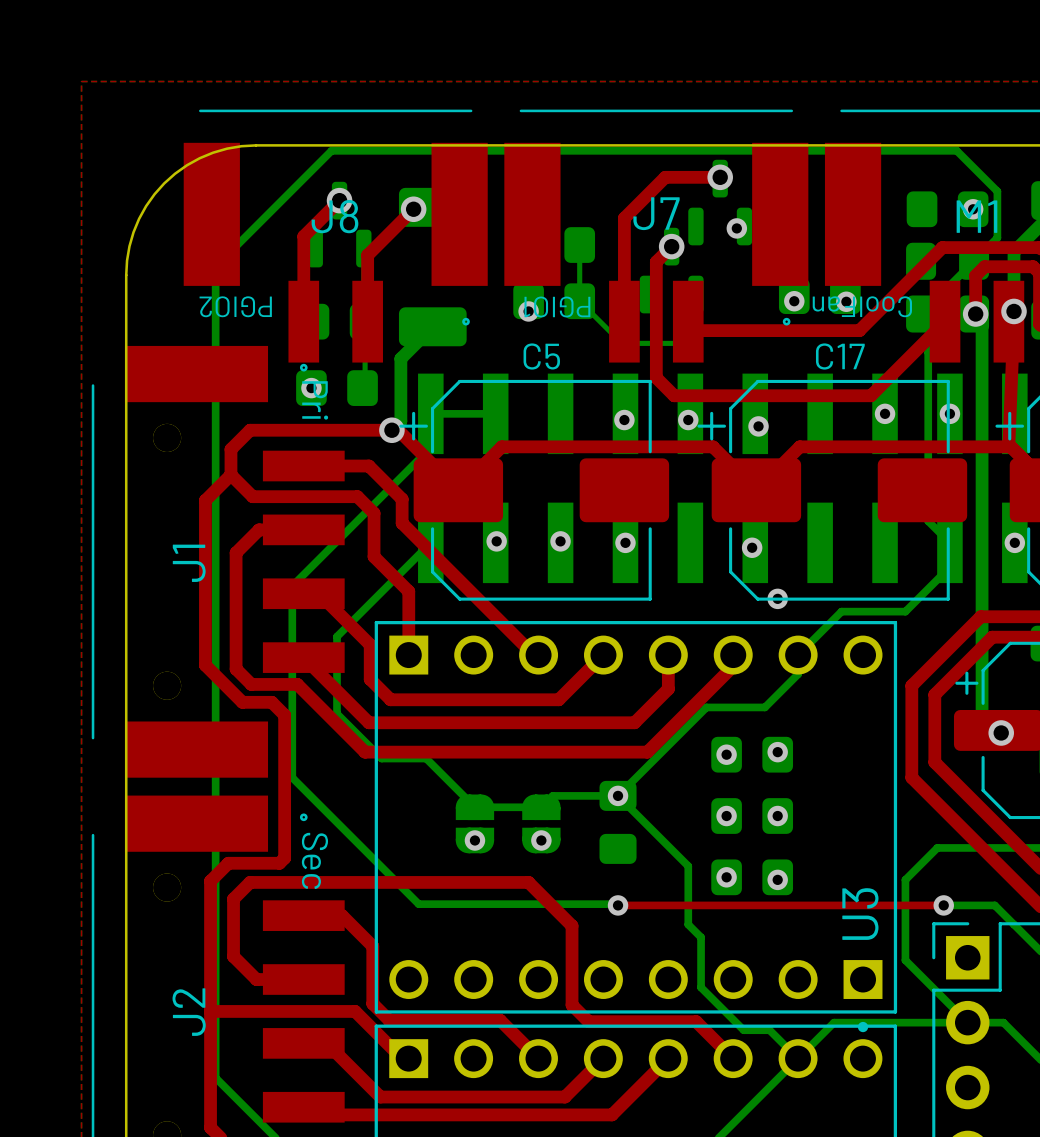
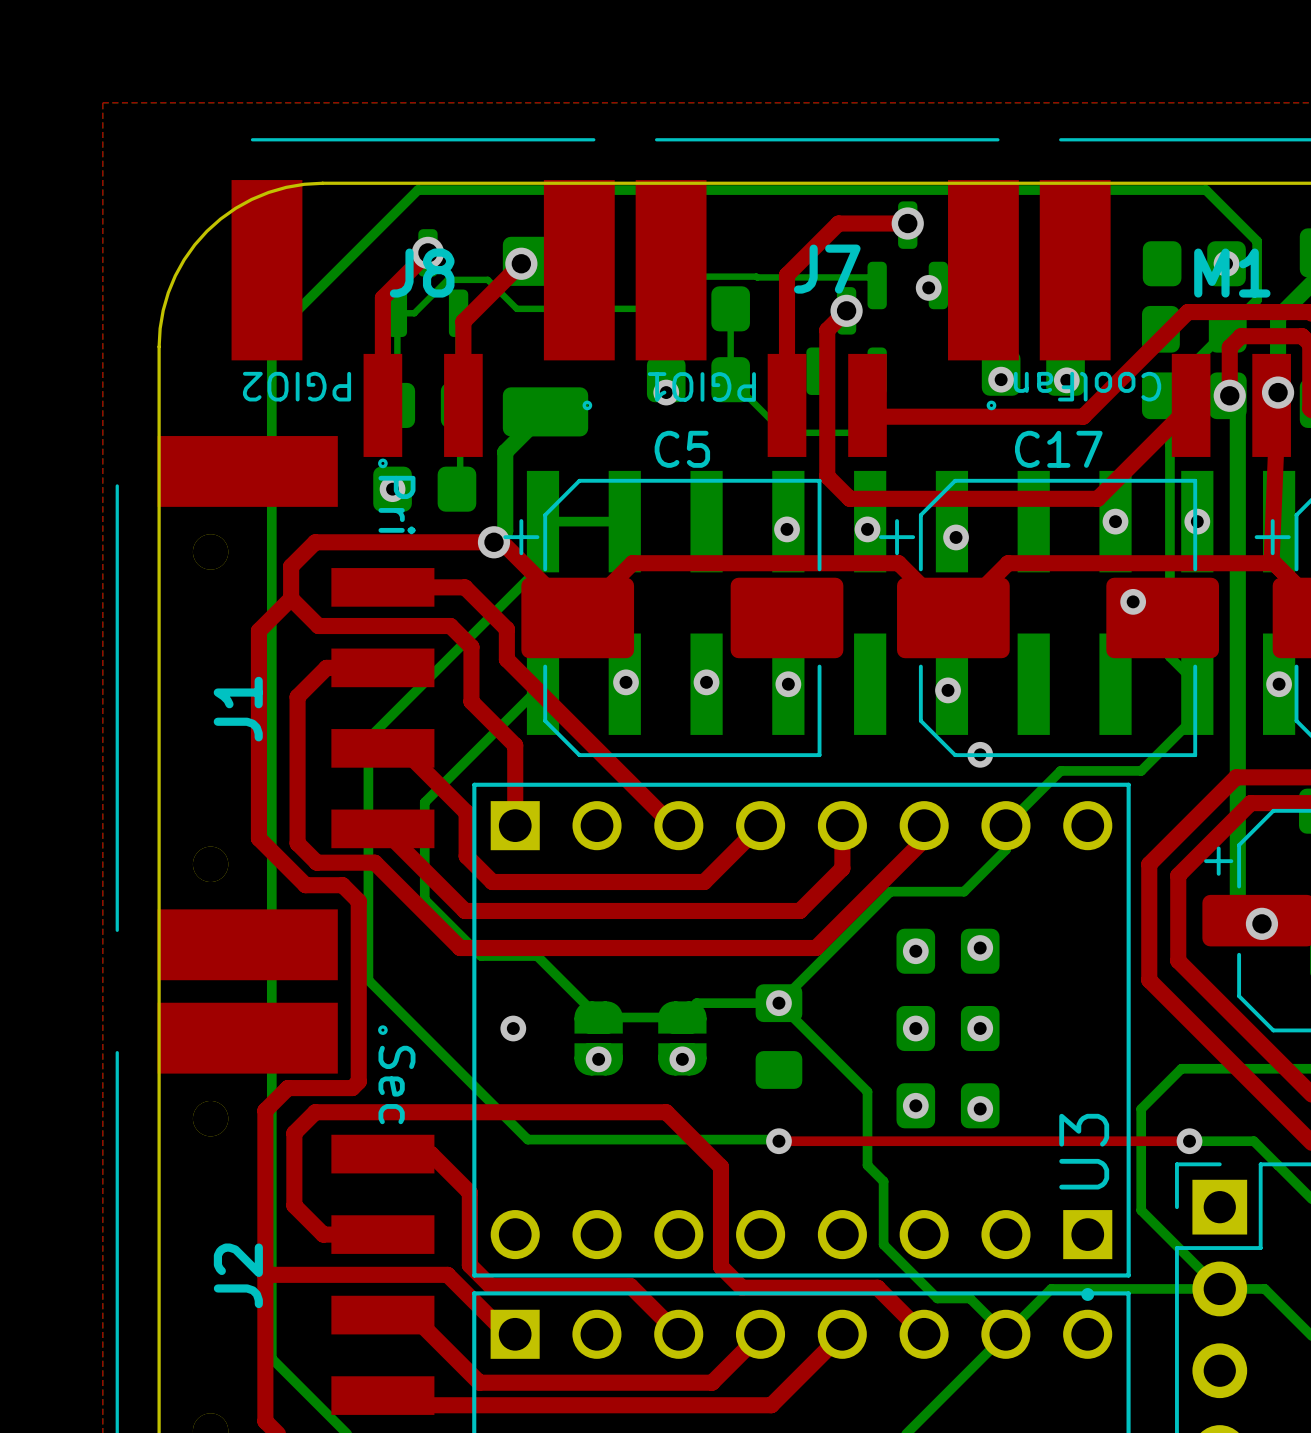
bottom track: none -> (877, 285) (869, 277) (698, 276) (666, 308) (516, 308) (487, 279) (447, 279) (414, 313) (397, 313) (397, 403) (395, 405)
via: none -> (1133, 601)
via: none -> (513, 1028)

